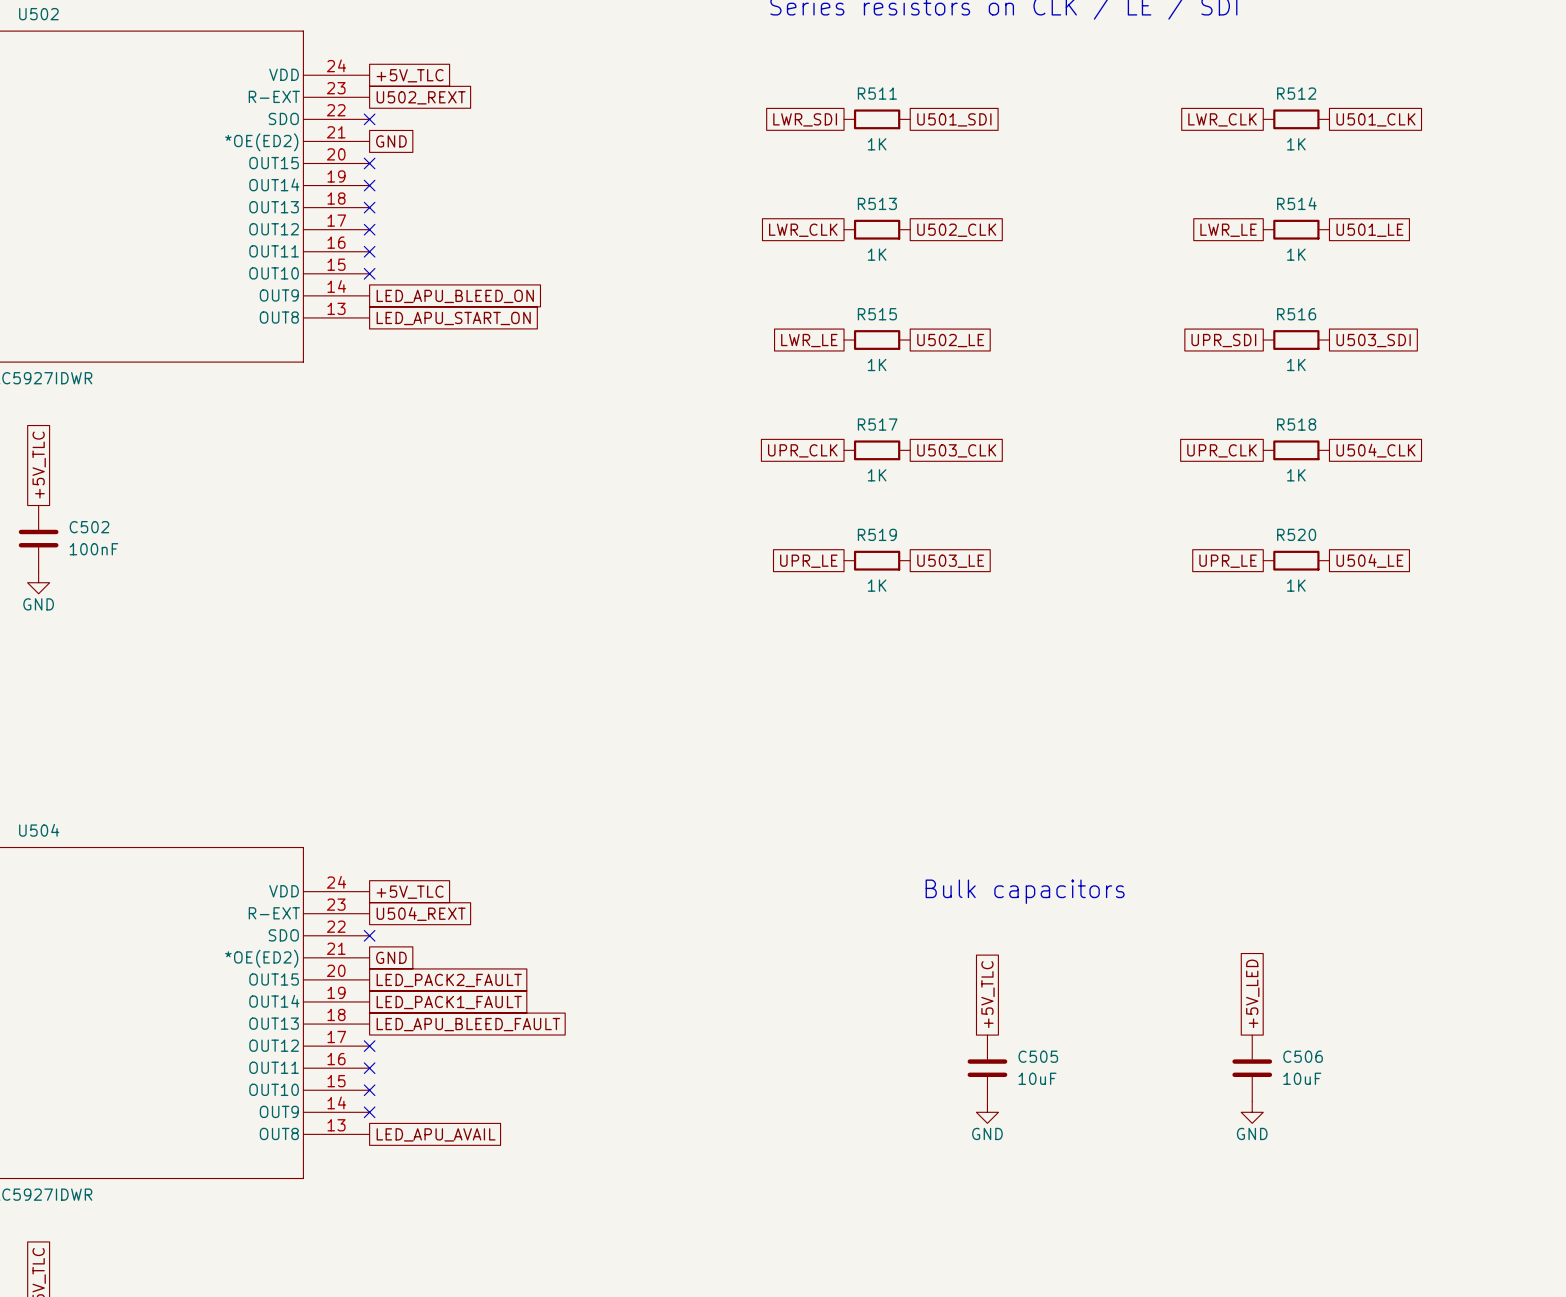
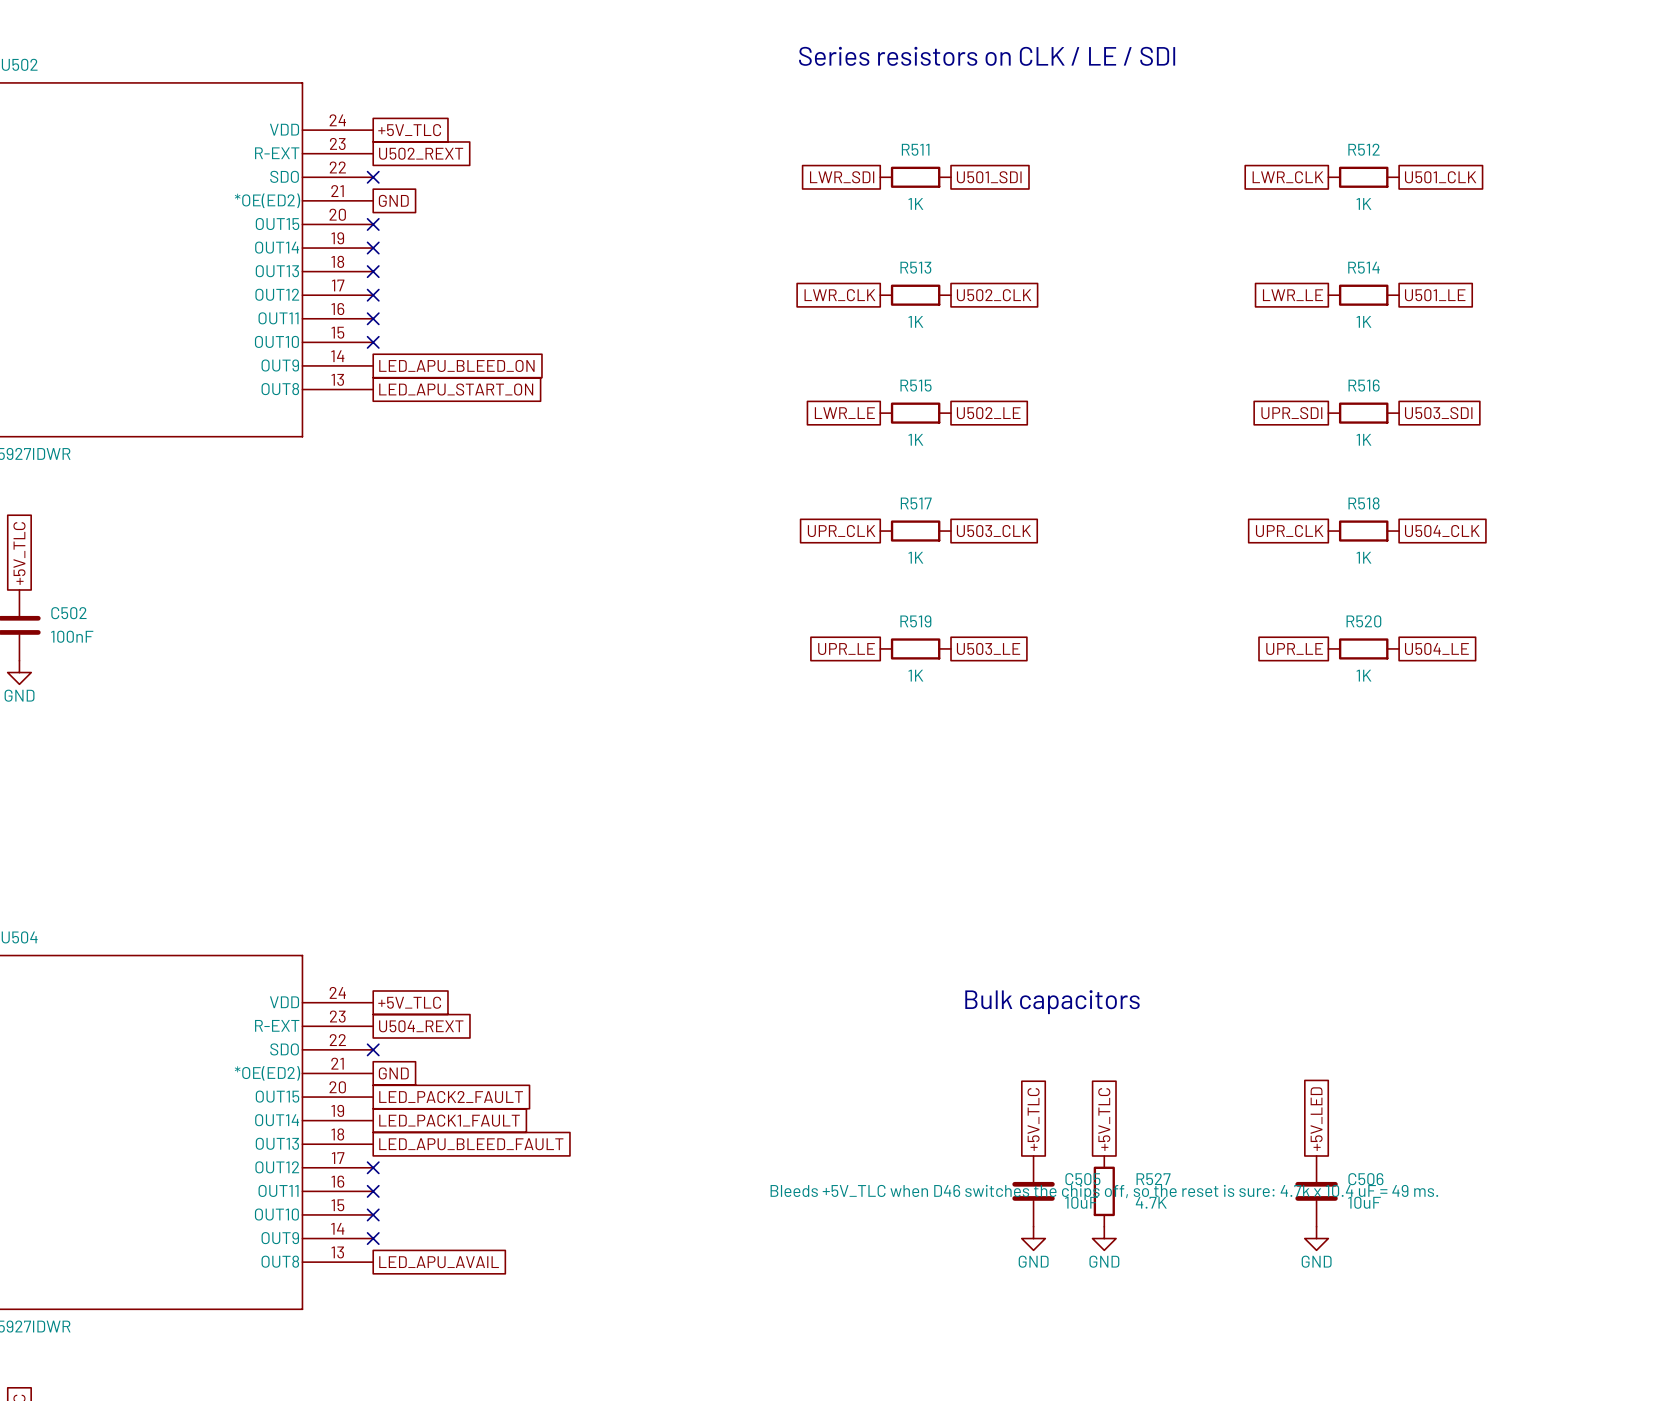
global label: none -> +5V_TLC (1104, 1119)
R527: none -> 4.7K (1104, 1191)
power symbol: none -> GND (1104, 1238)

